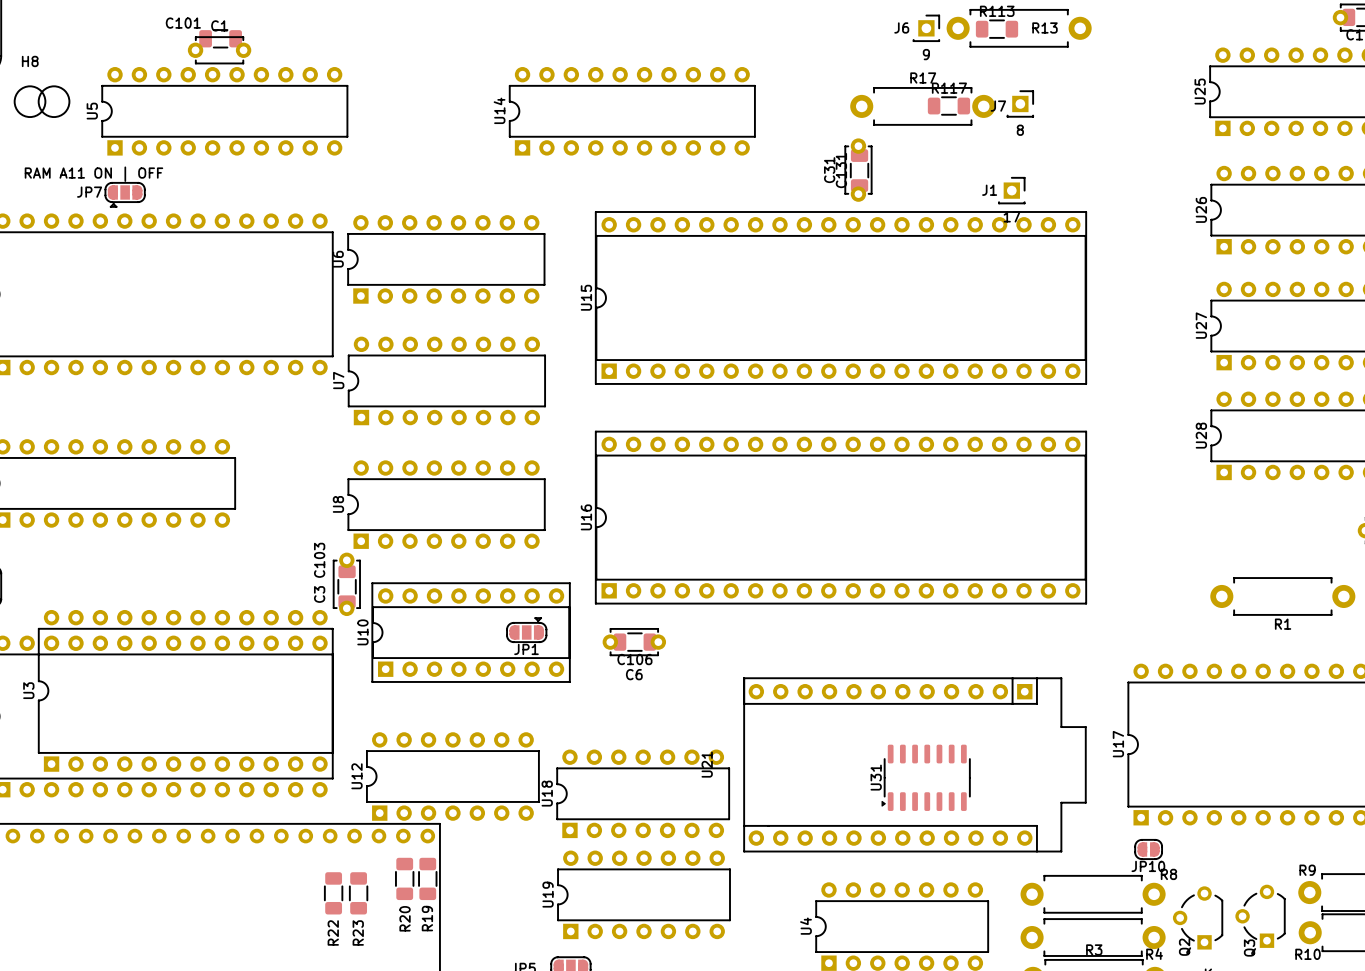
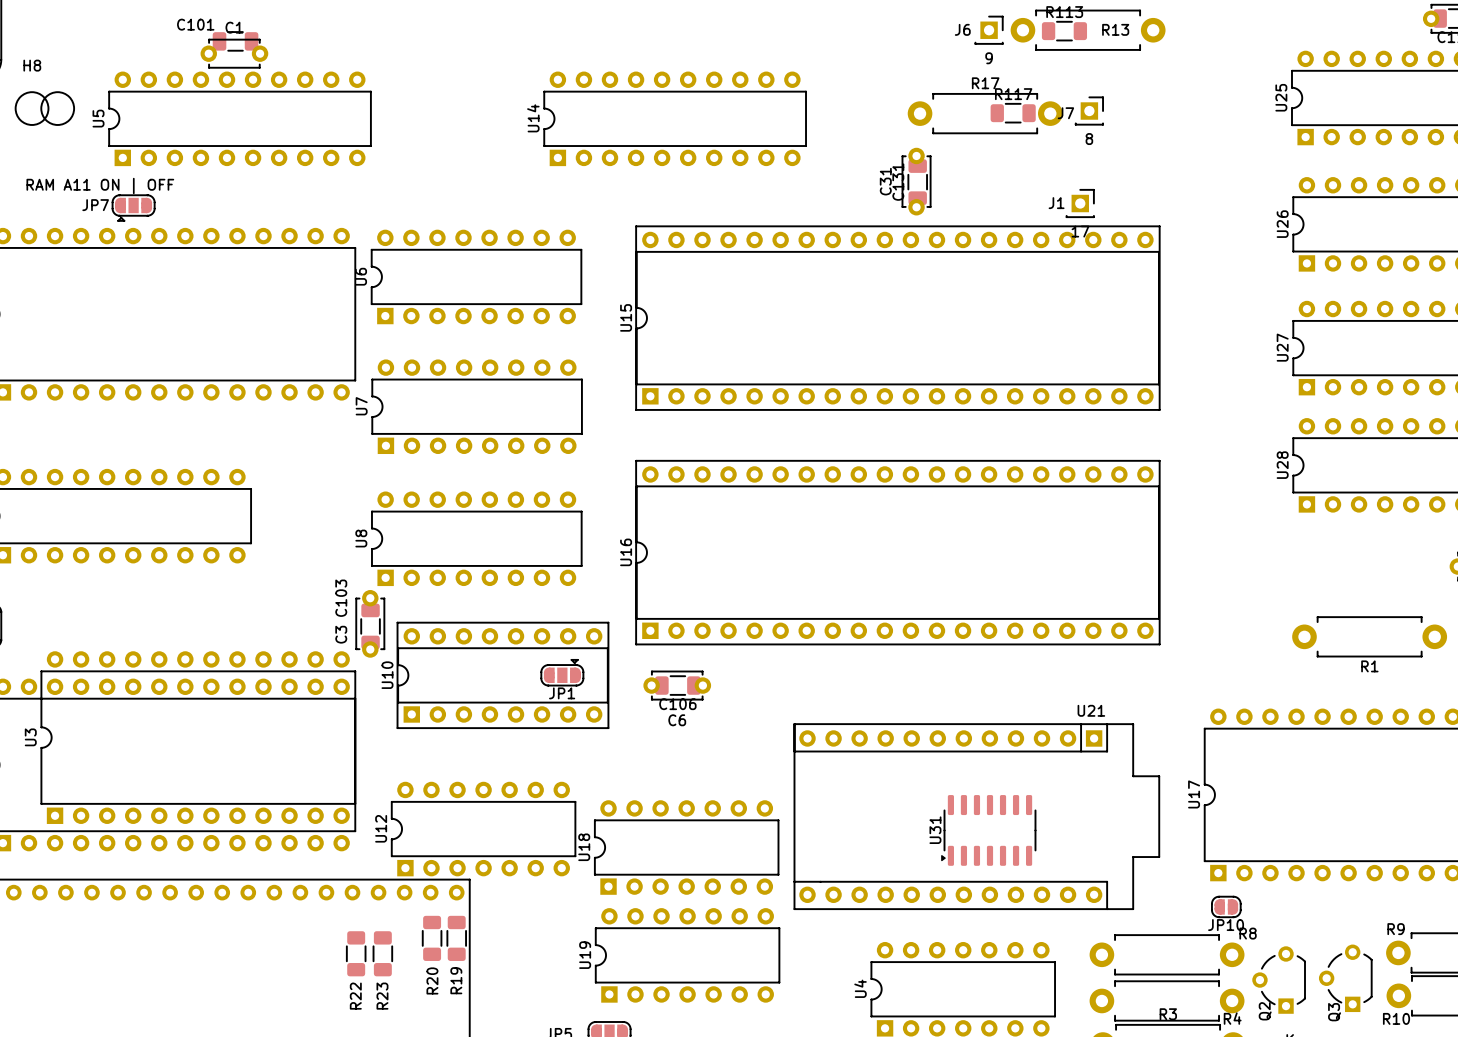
U21 name rotation: 0° (707, 764) -> 90° clockwise (1091, 710)
U21 name position: U21 (707, 764) -> U21 (1091, 710)

